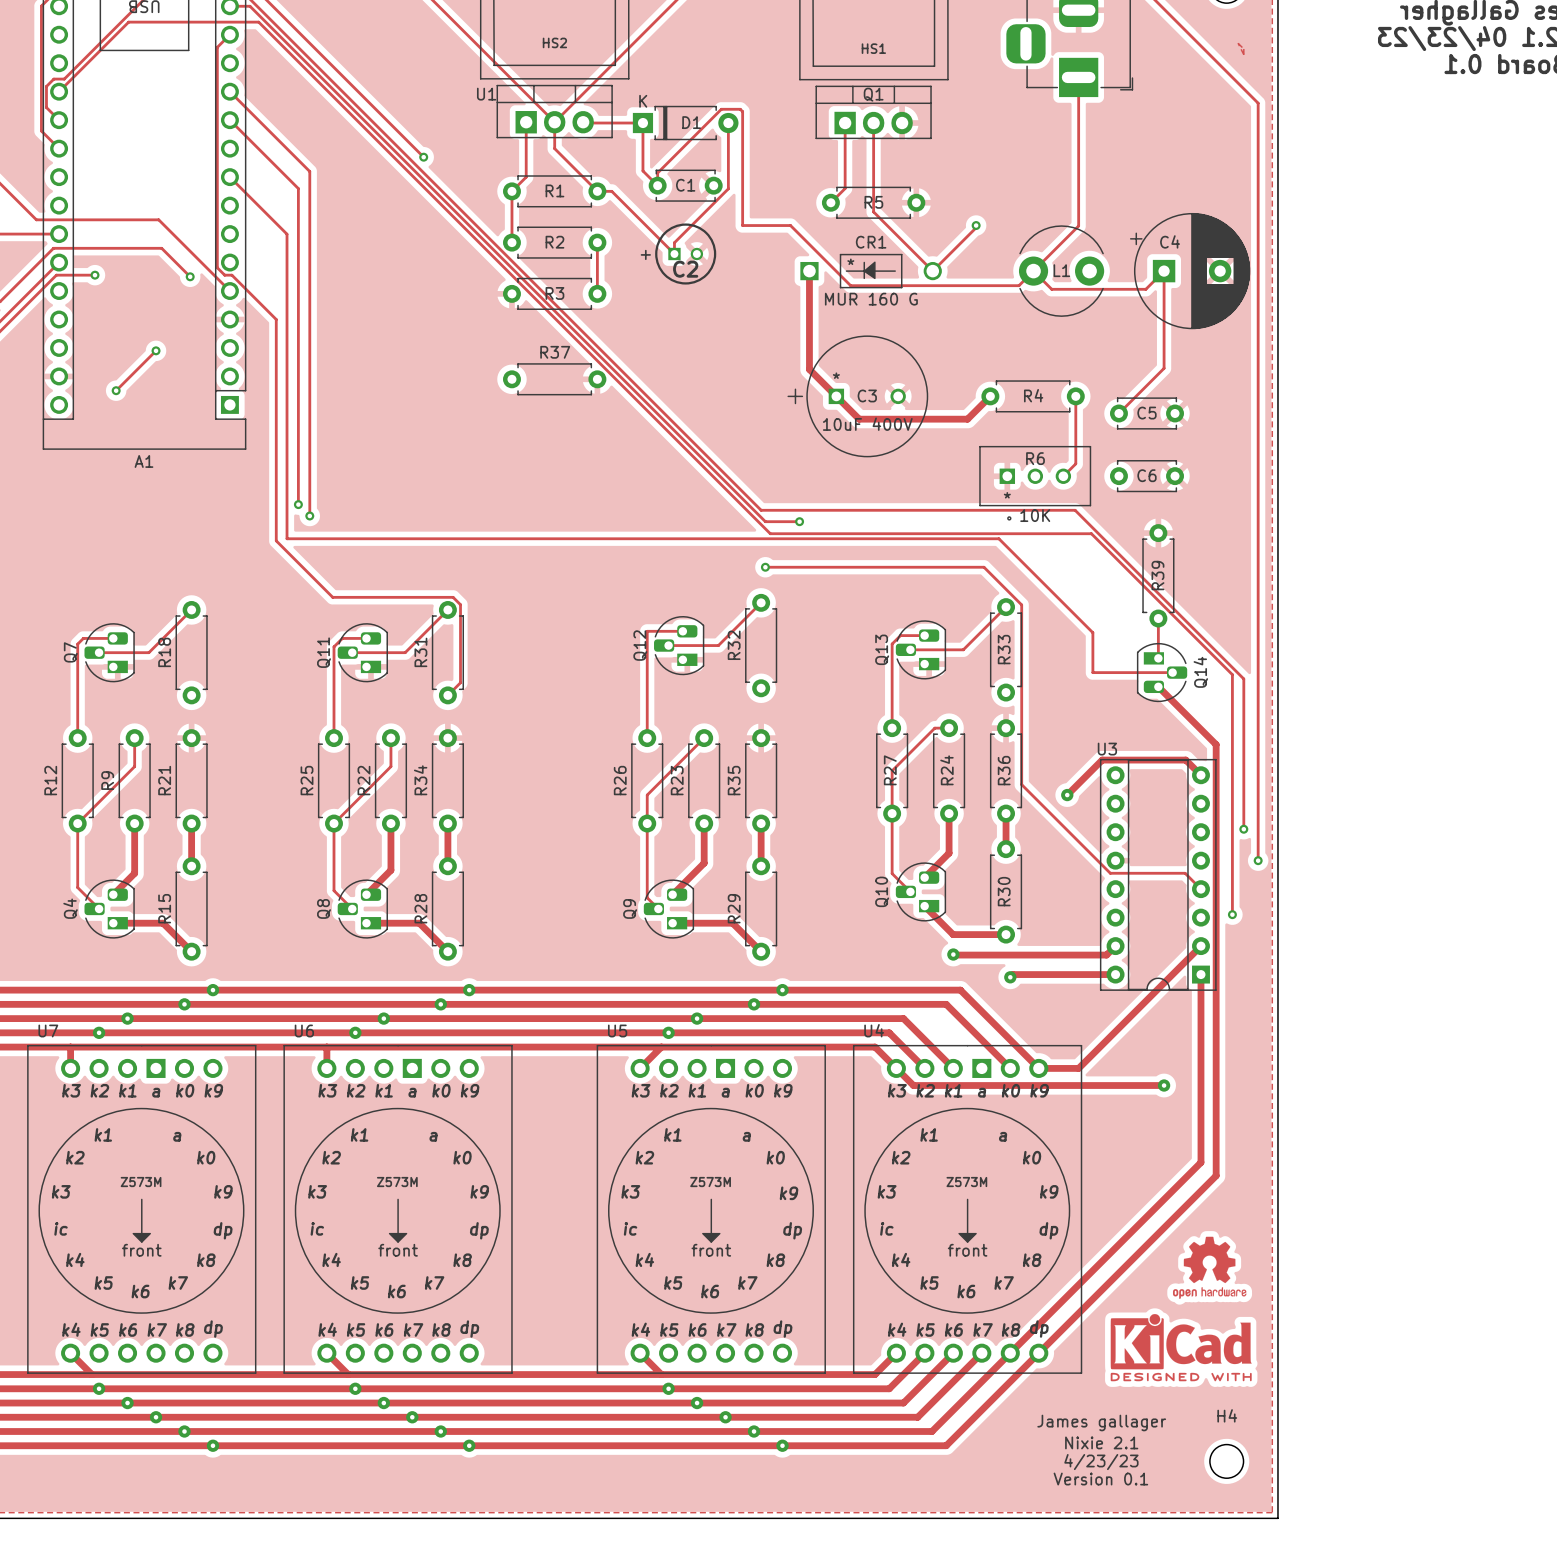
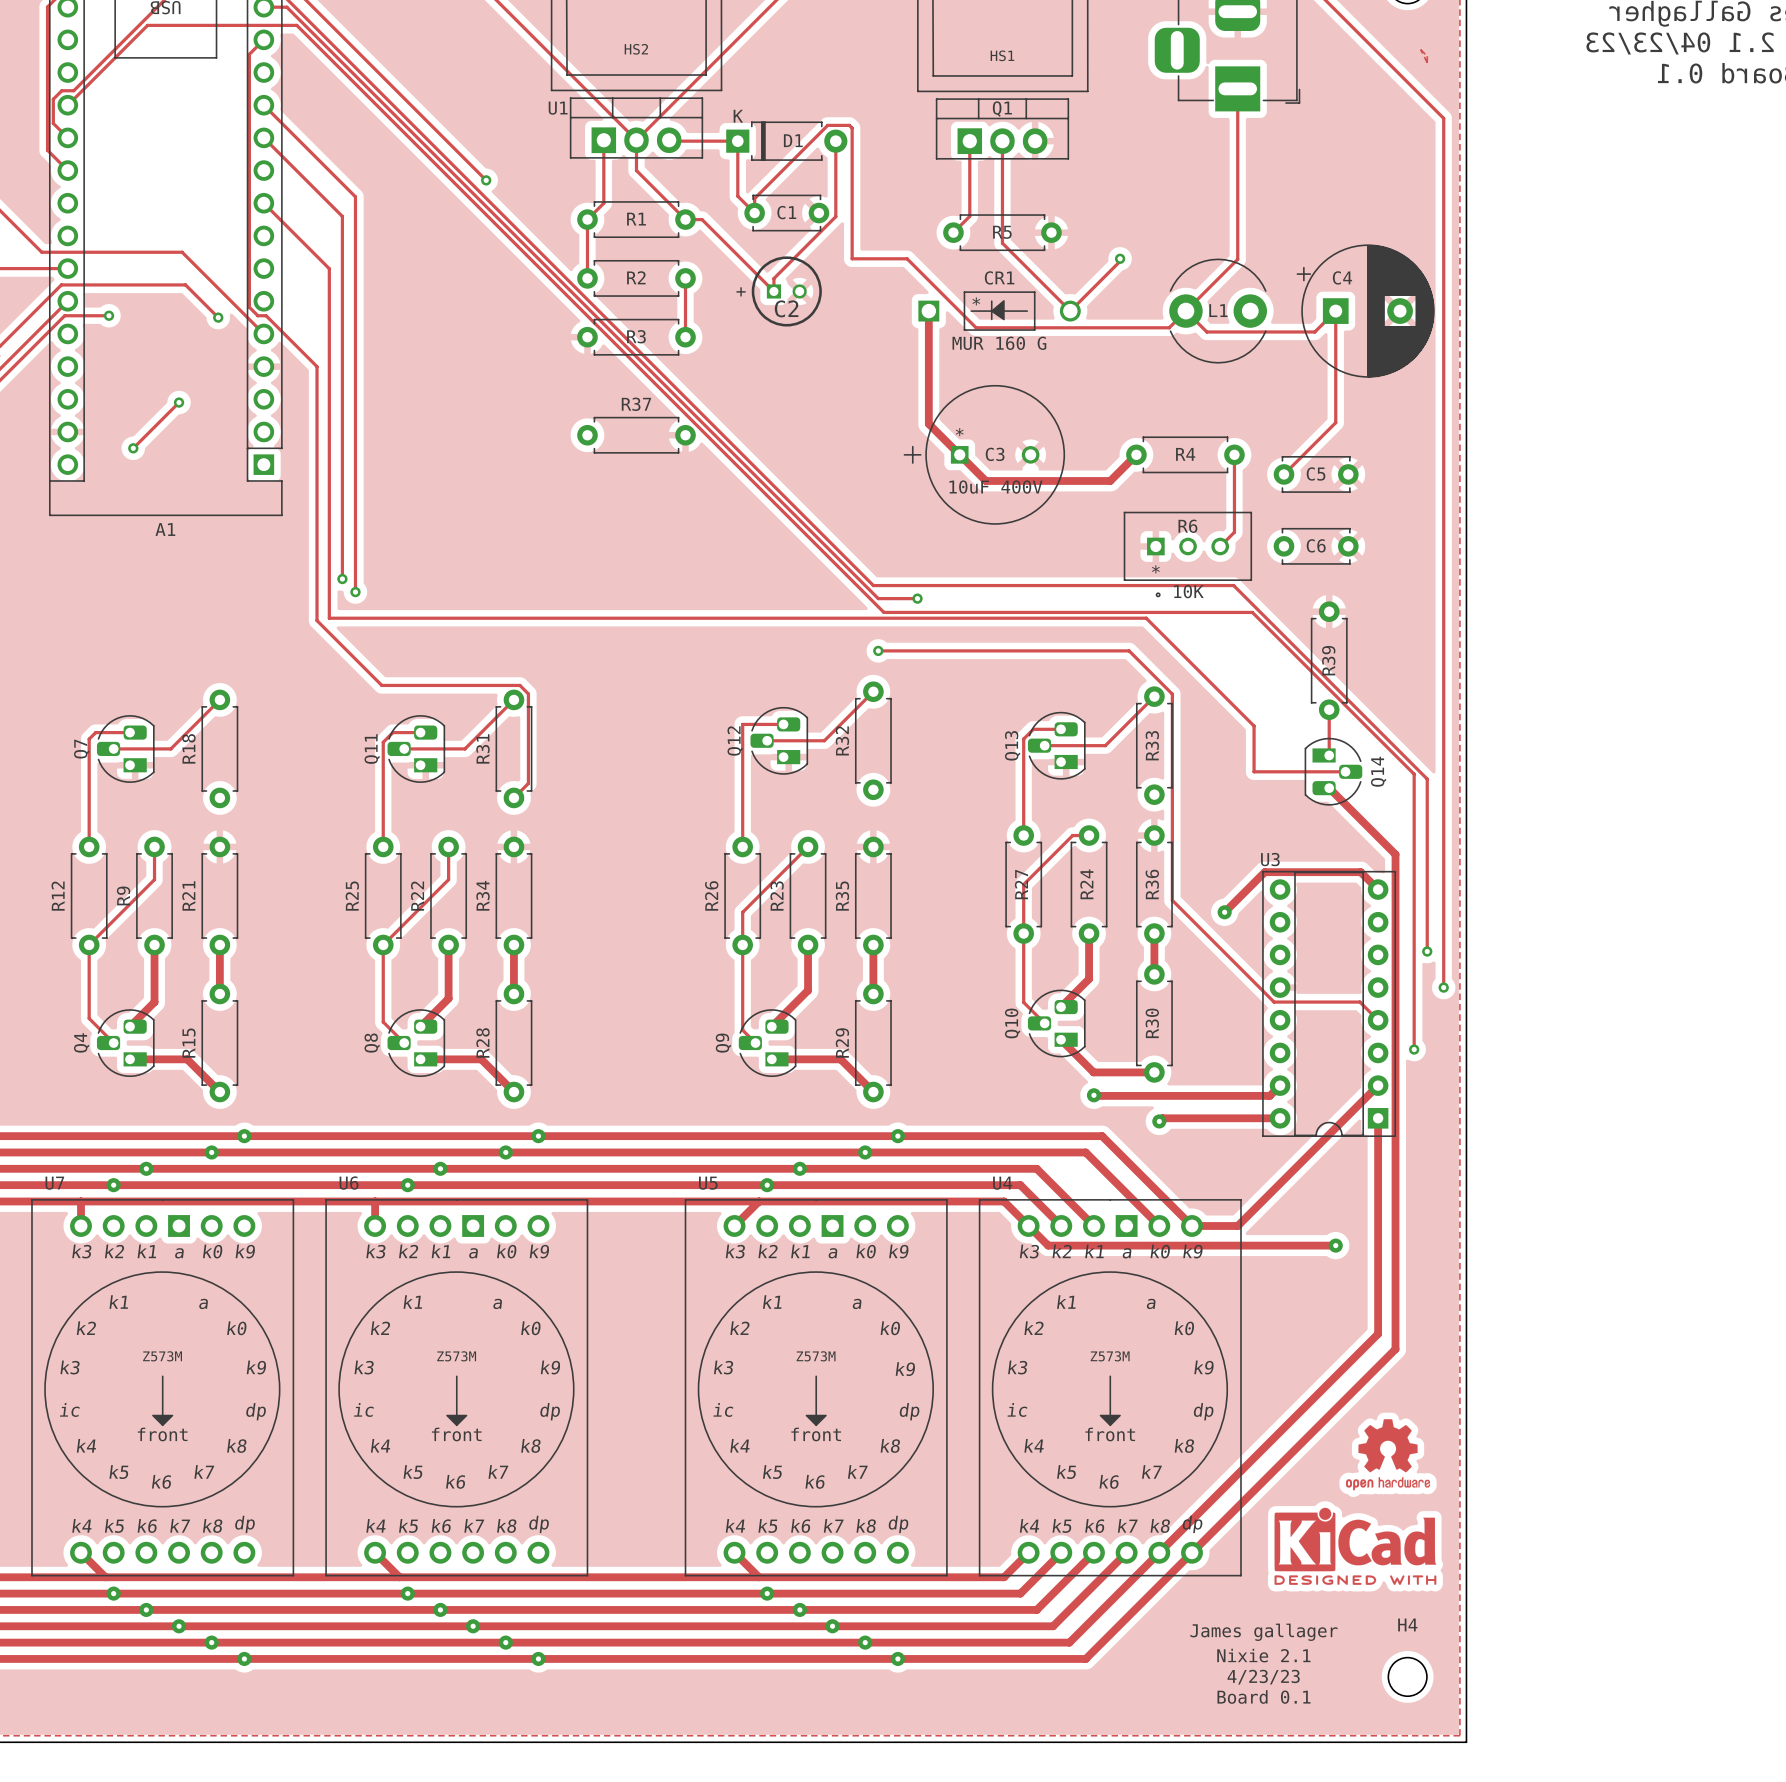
text: Version 0.1 (1100, 1479) -> Board 0.1 (1263, 1697)

